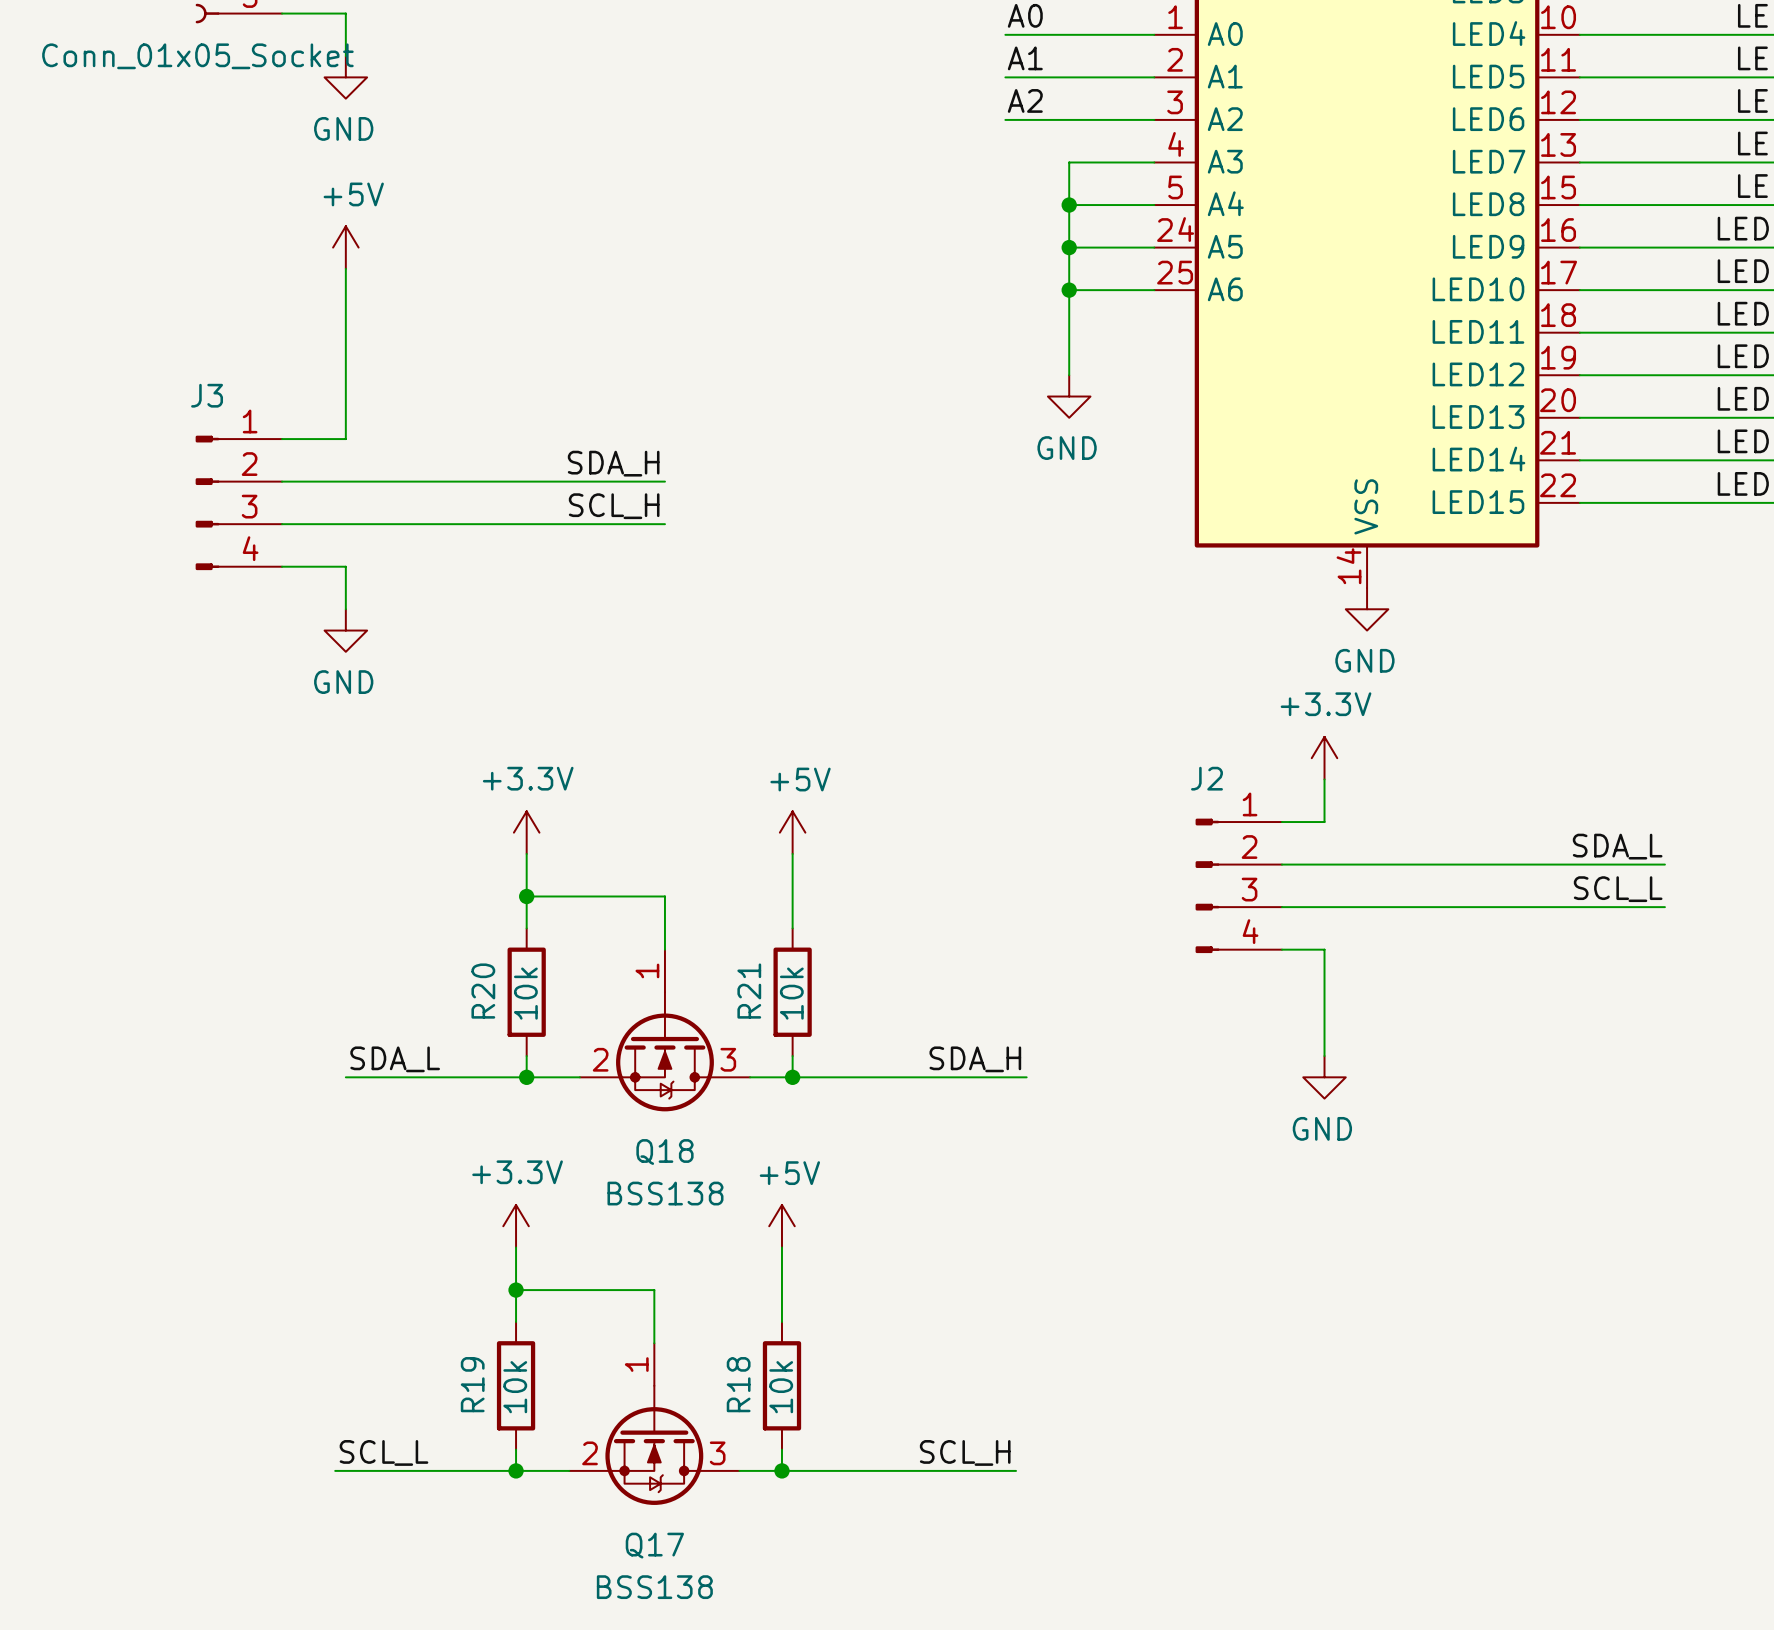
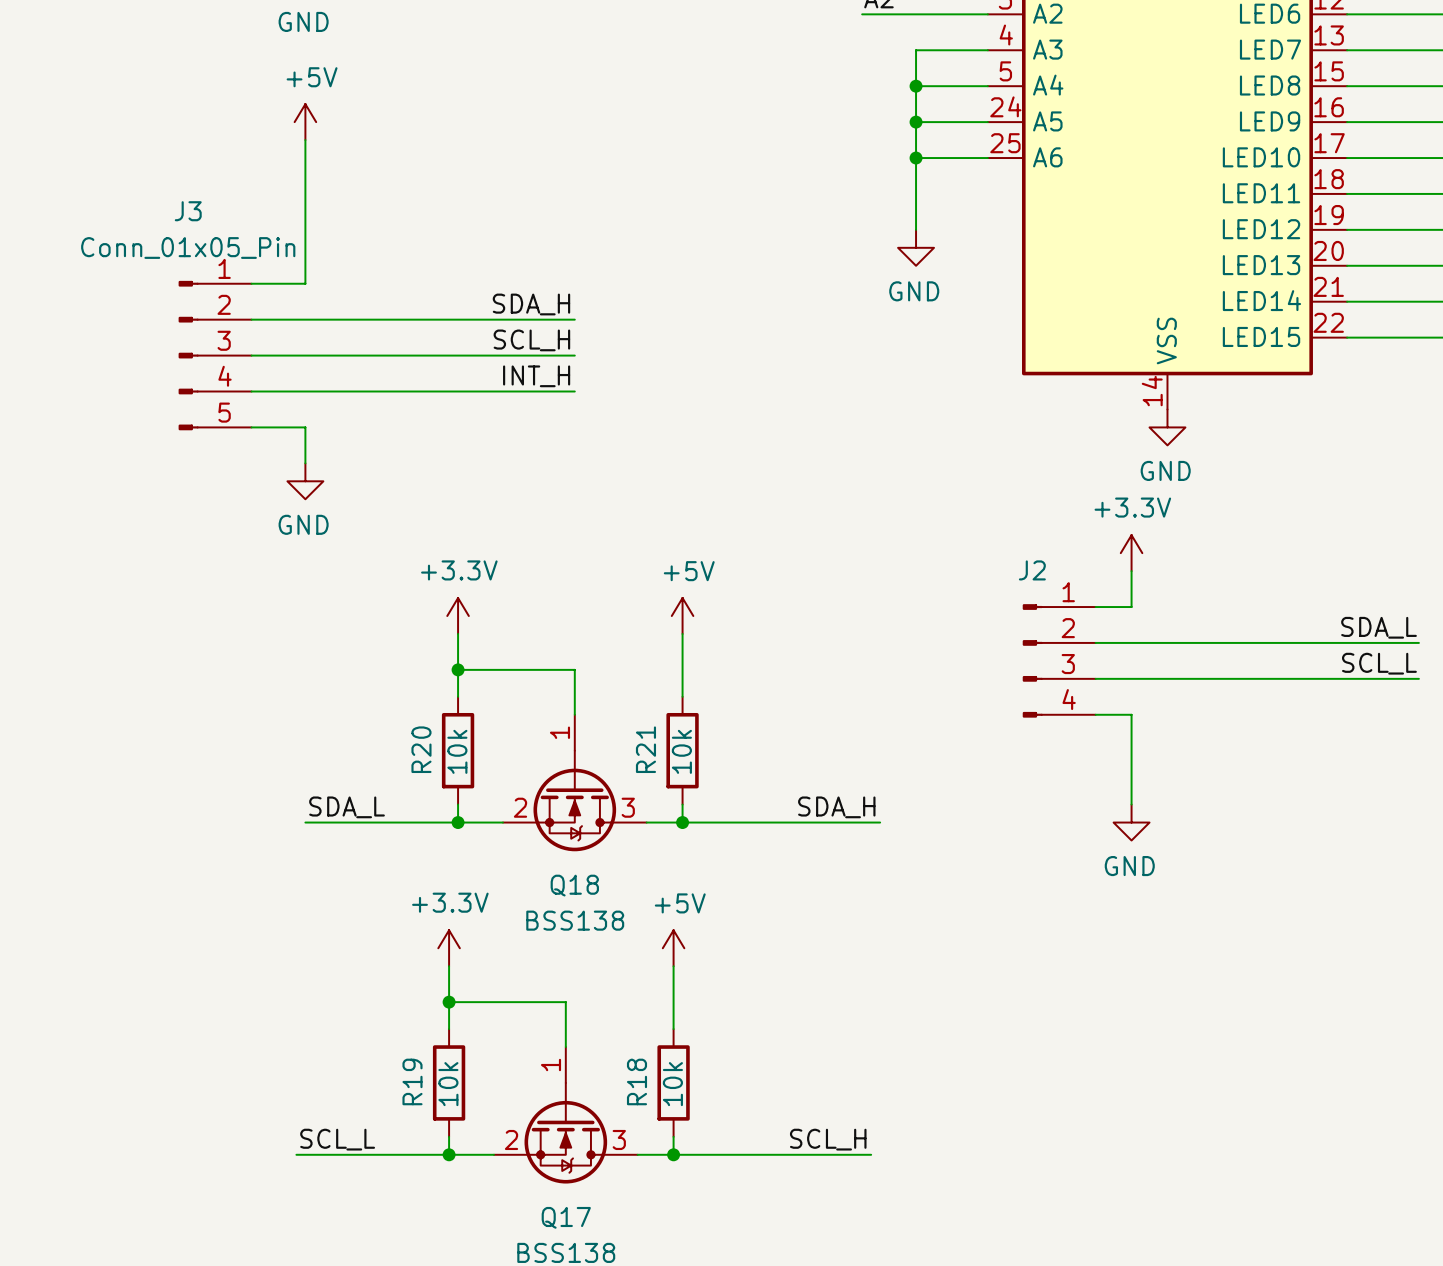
J3 name position: J3 (207, 395) -> J3 (188, 211)
J3 value: none -> Conn_01x05_Pin (188, 248)
J3 symbol: [195, 435, 283, 571] -> [178, 280, 252, 431]
label: none -> INT_H (536, 376)
wire: (345, 566) (345, 609) -> (305, 391) (574, 391)
wire: none -> (251, 427) (305, 427) (305, 463)
power symbol position: GND (345, 630) -> GND (305, 481)

